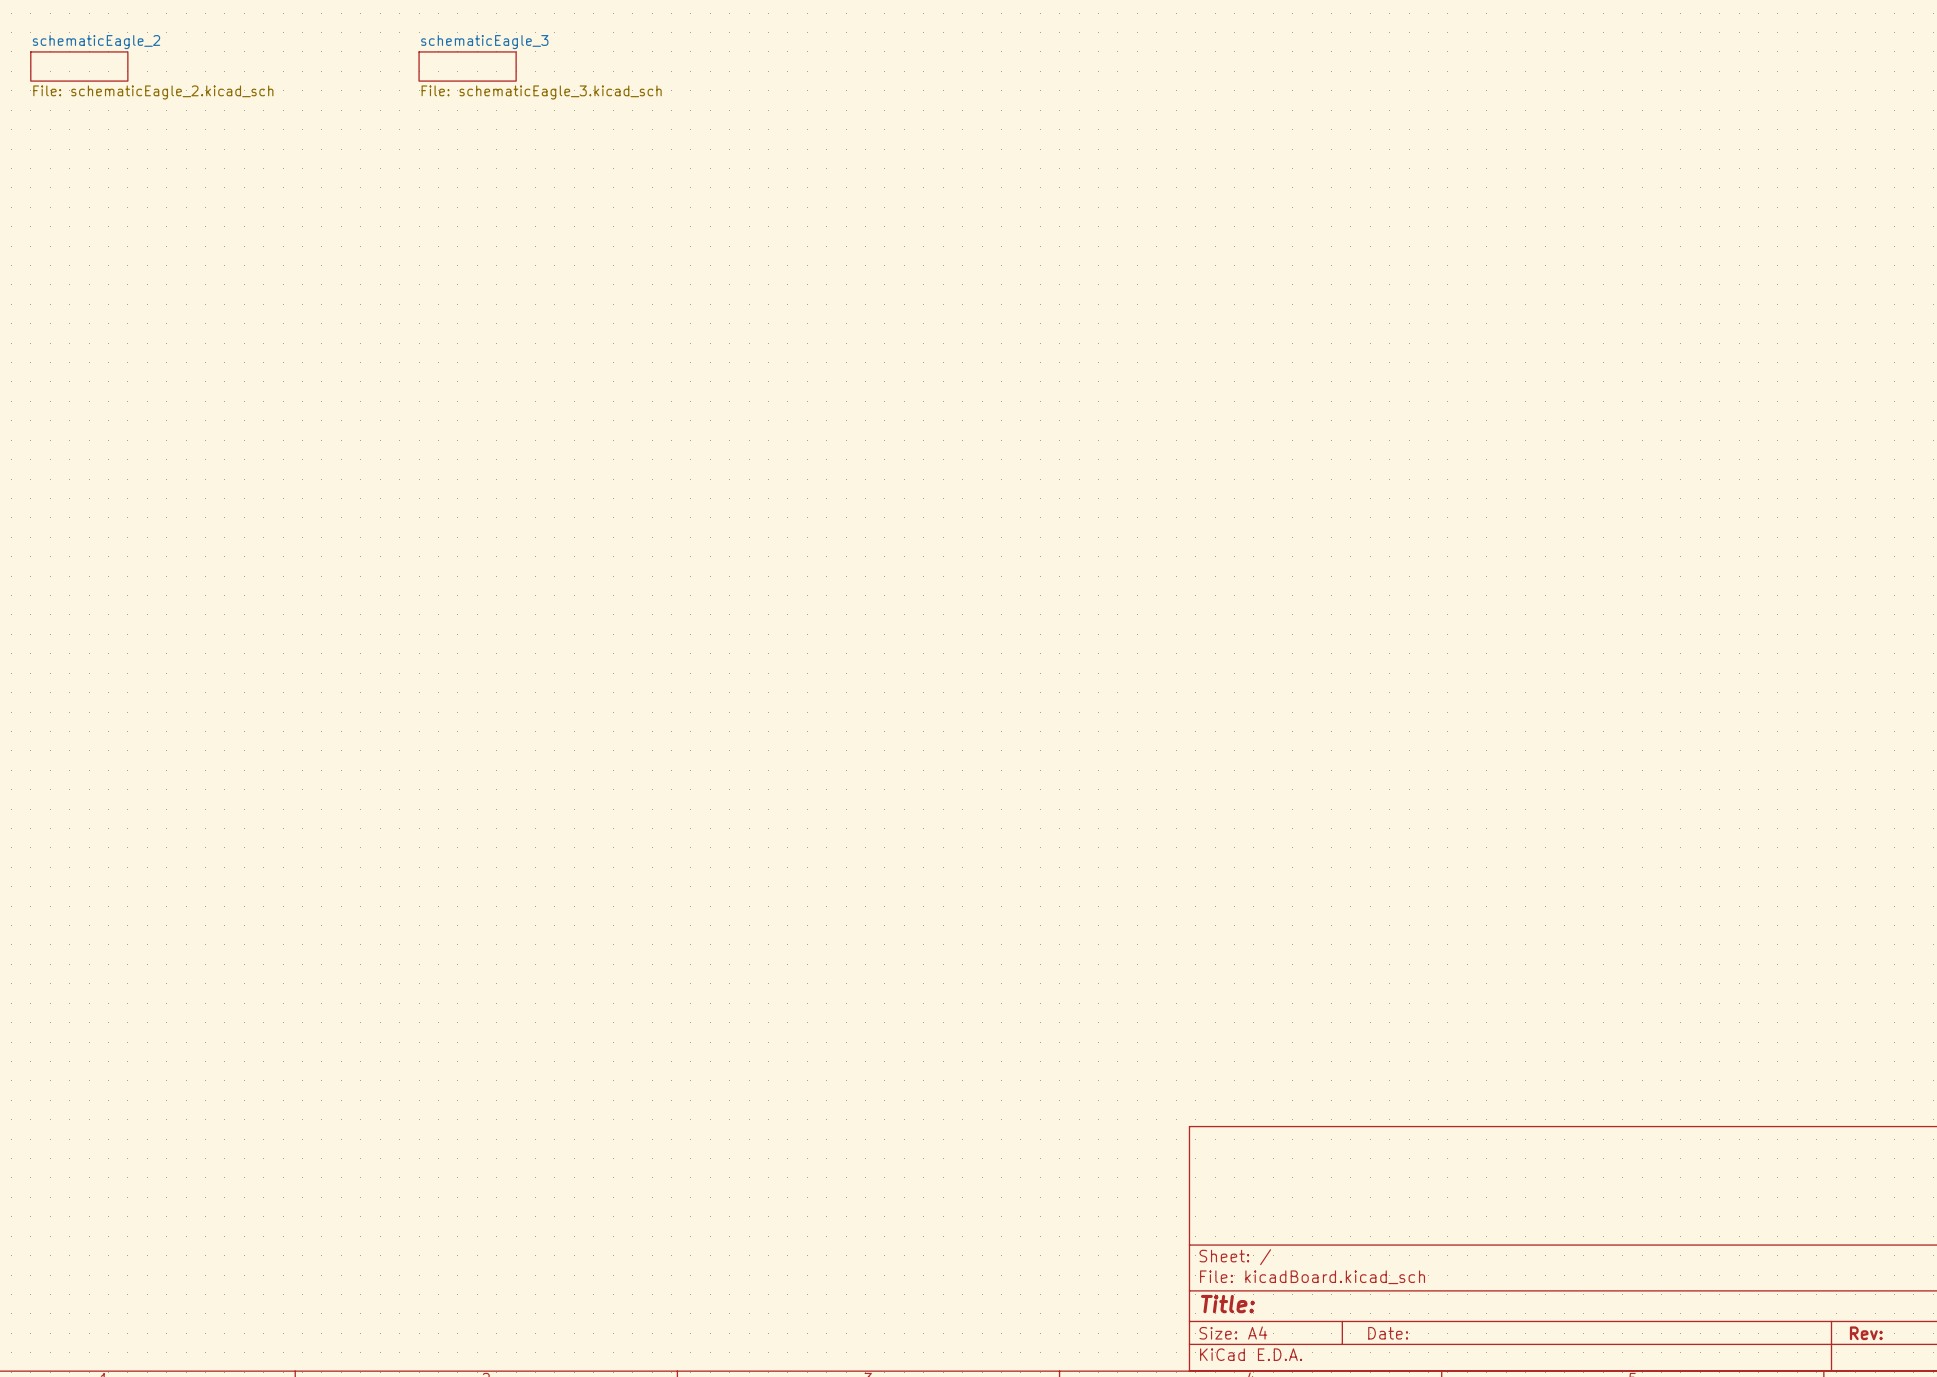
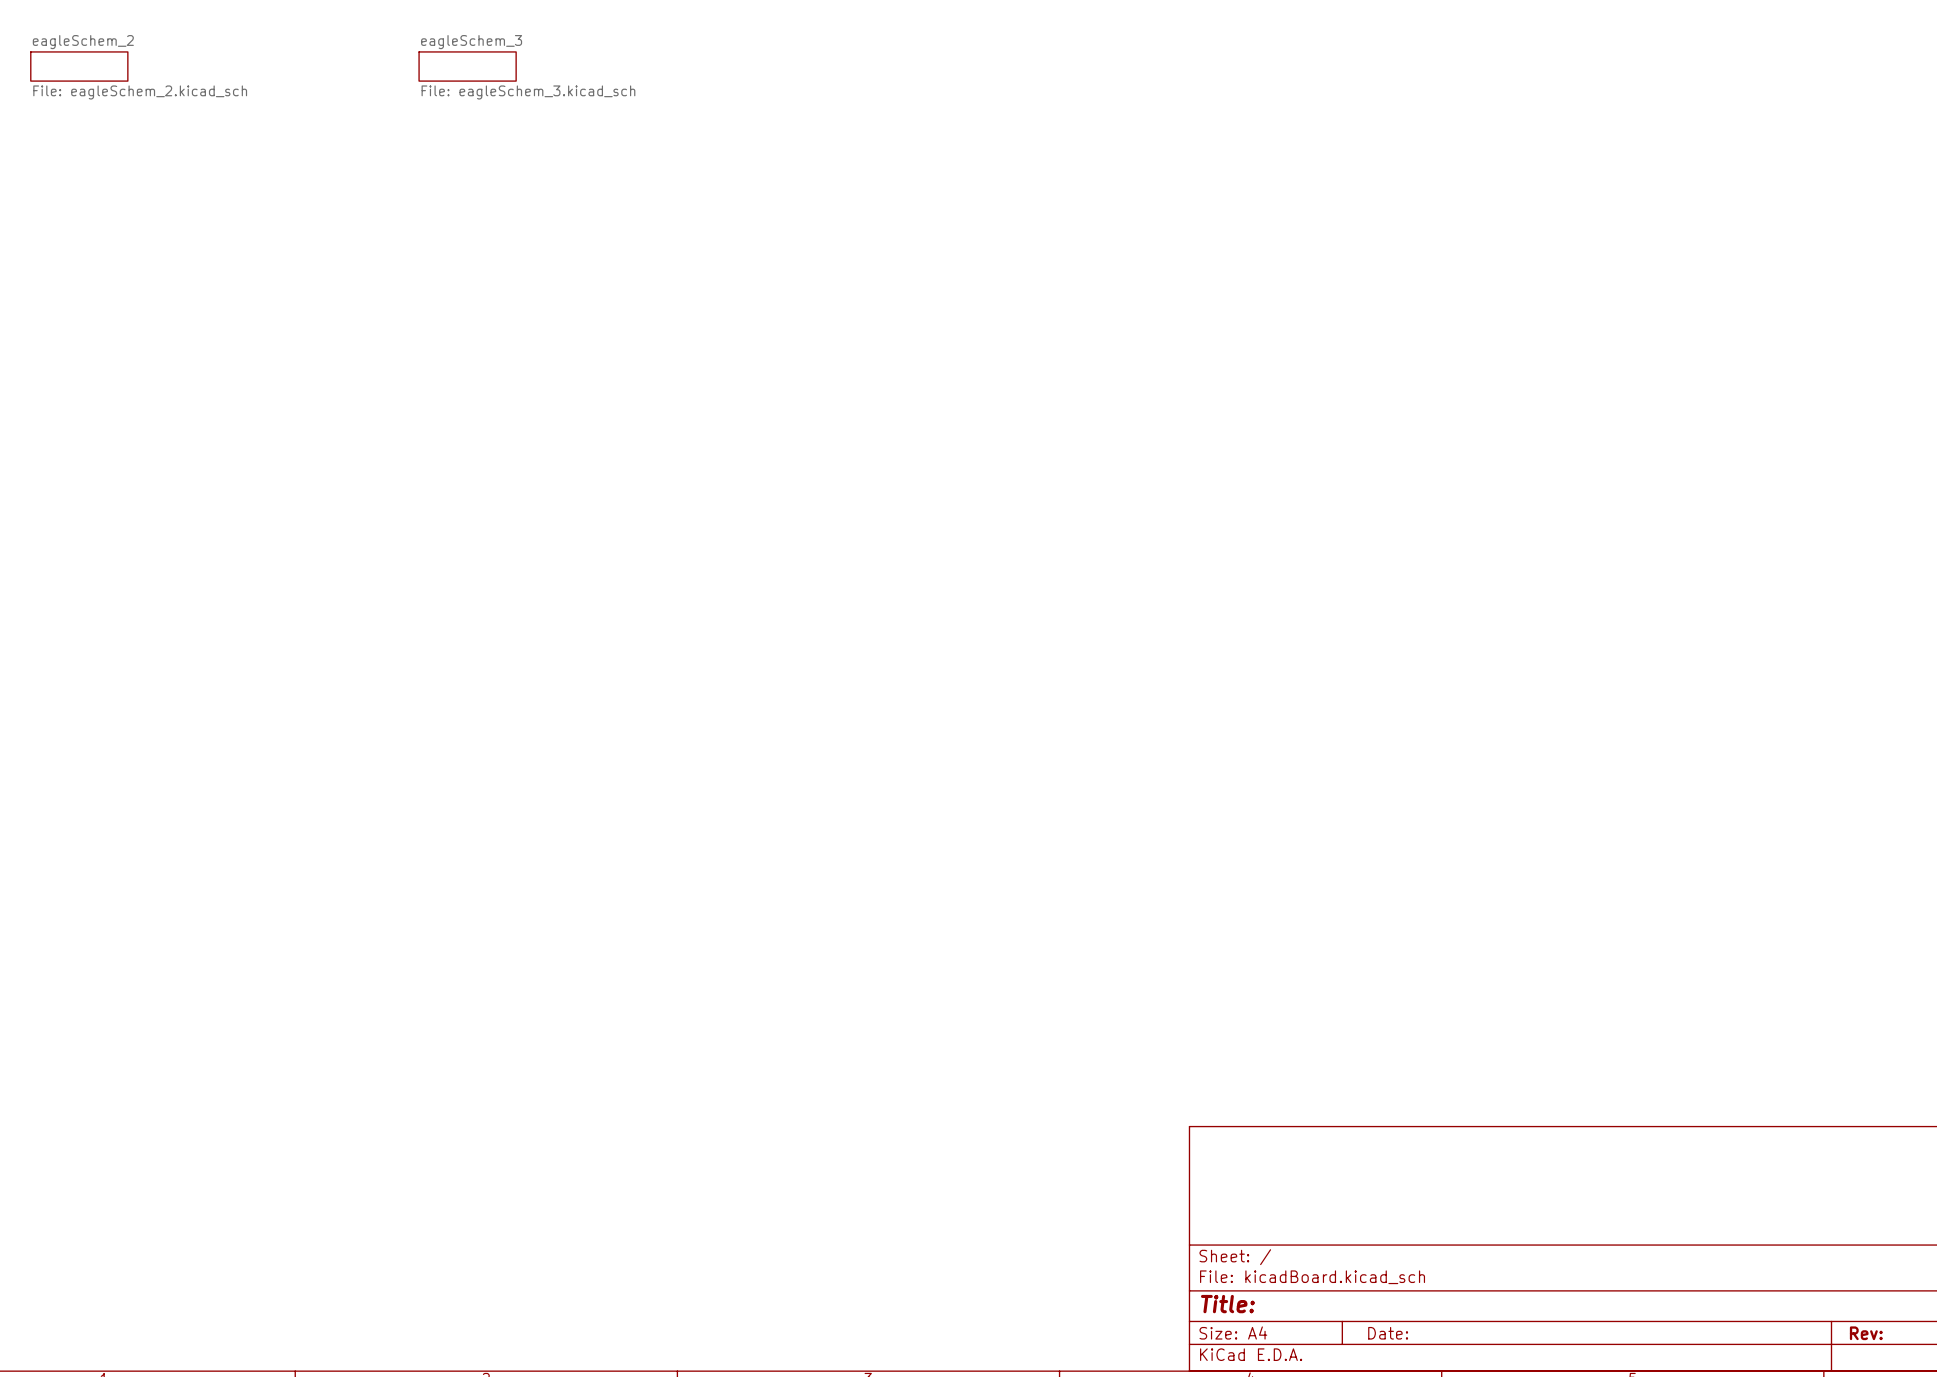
sheet schematicEagle_2 name: schematicEagle_2 (96, 42) -> eagleSchem_2 (83, 42)
sheet schematicEagle_3 name: schematicEagle_3 (484, 42) -> eagleSchem_3 (471, 42)
sheet schematicEagle_2 value: File: schematicEagle_2.kicad_sch (153, 92) -> File: eagleSchem_2.kicad_sch (140, 92)
sheet schematicEagle_3 value: File: schematicEagle_3.kicad_sch (541, 92) -> File: eagleSchem_3.kicad_sch (528, 92)

